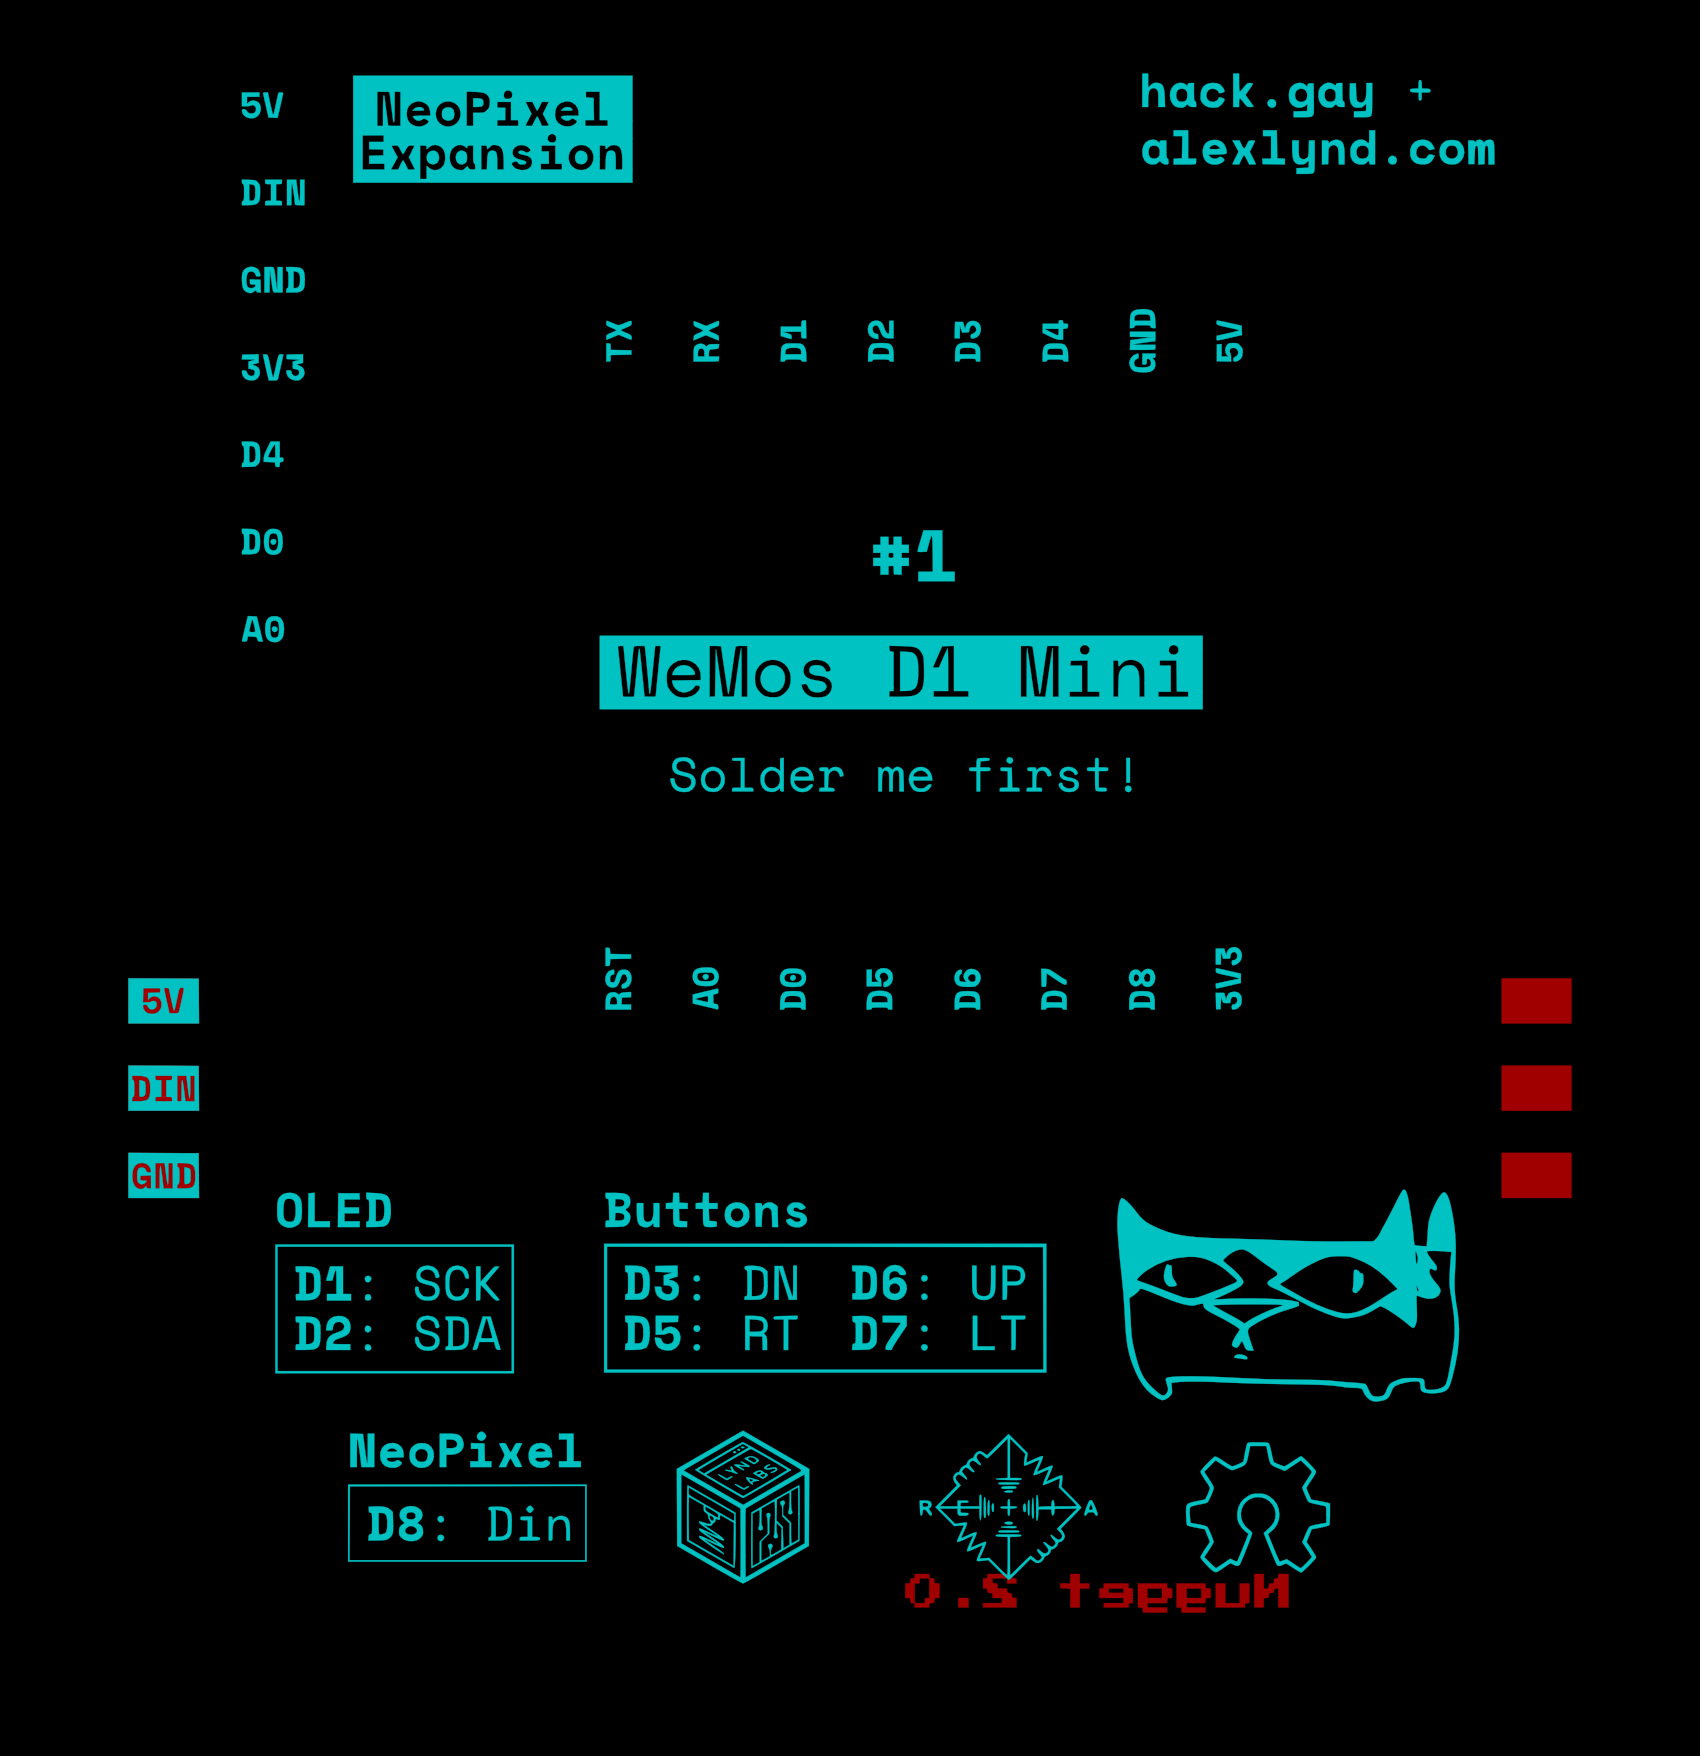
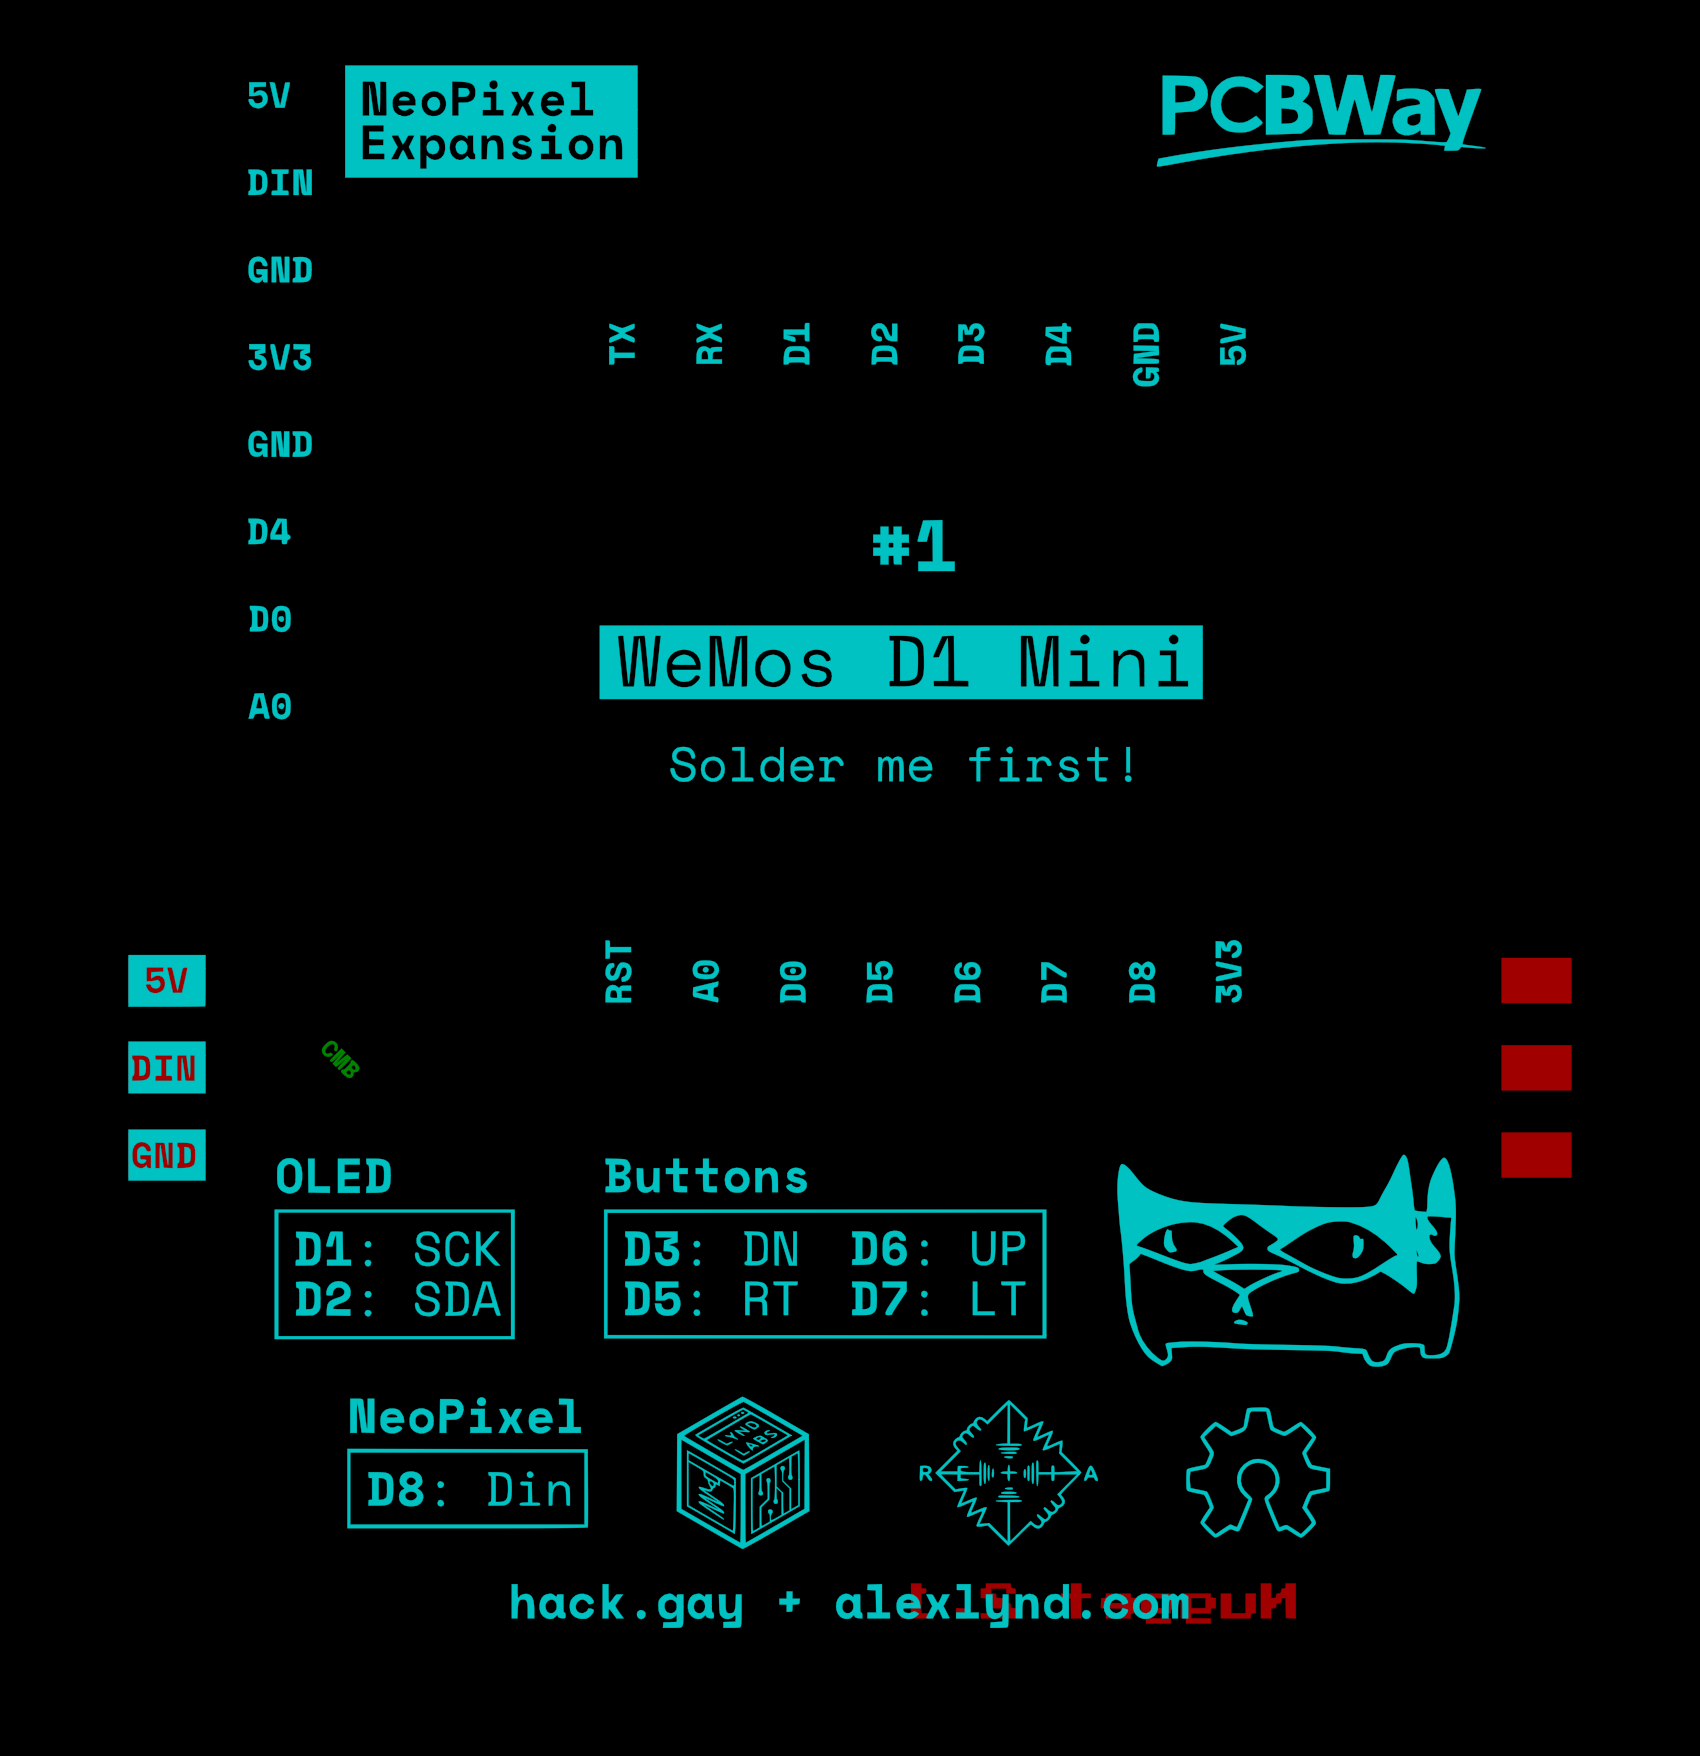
drawing shape: [128, 73, 1495, 1584] -> [128, 65, 1486, 1628]
drawing shape: [128, 978, 1572, 1613] -> [128, 957, 1572, 1624]
drawing: none -> [321, 1040, 360, 1079]

